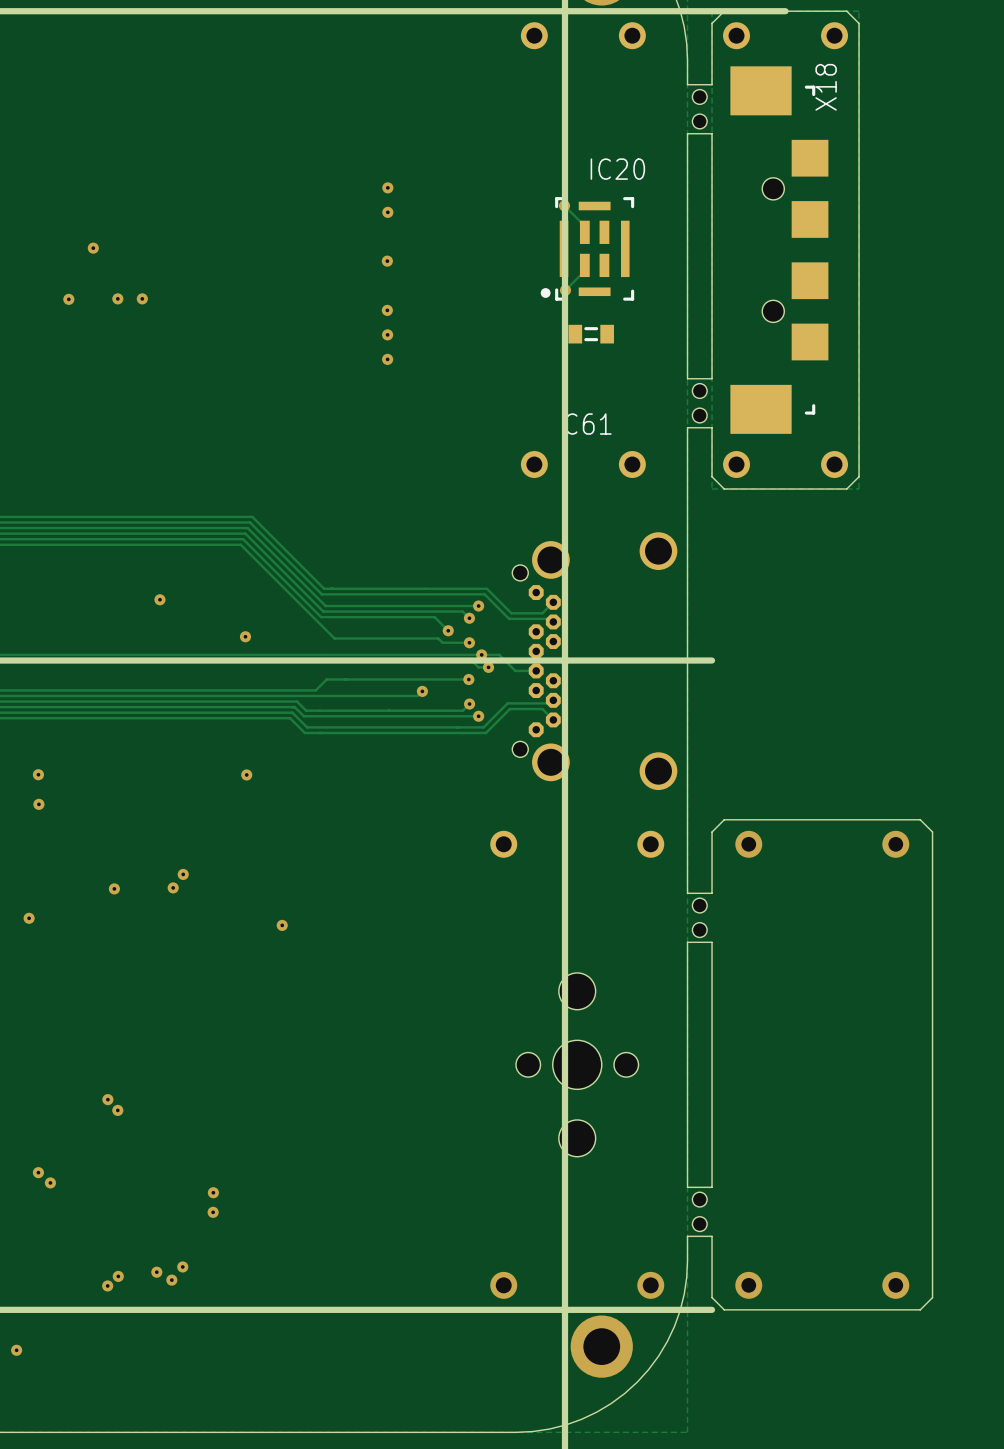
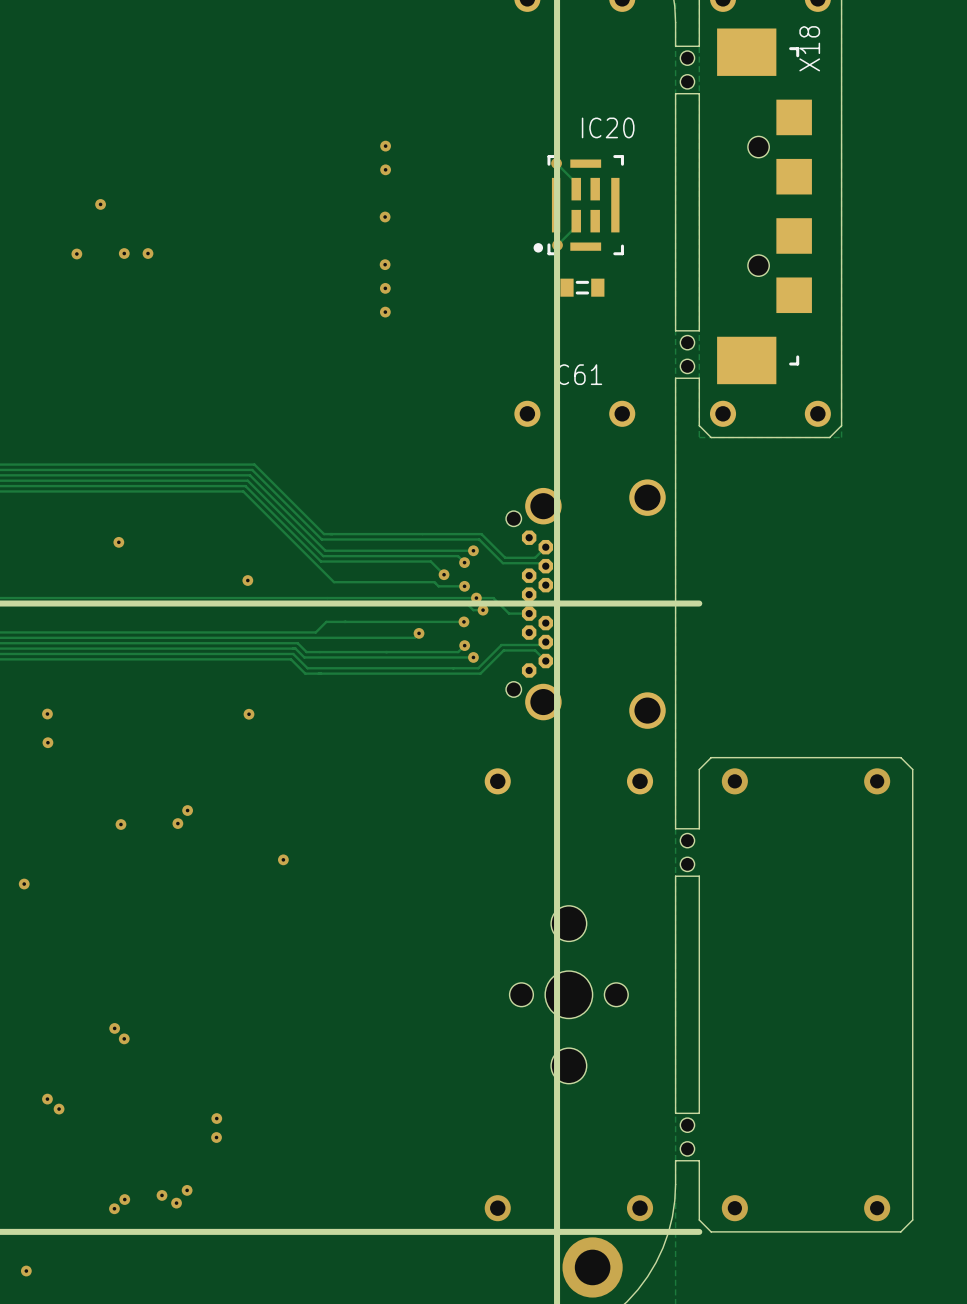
via position: (159, 599) -> (118, 542)
via position: (29, 918) -> (24, 884)

